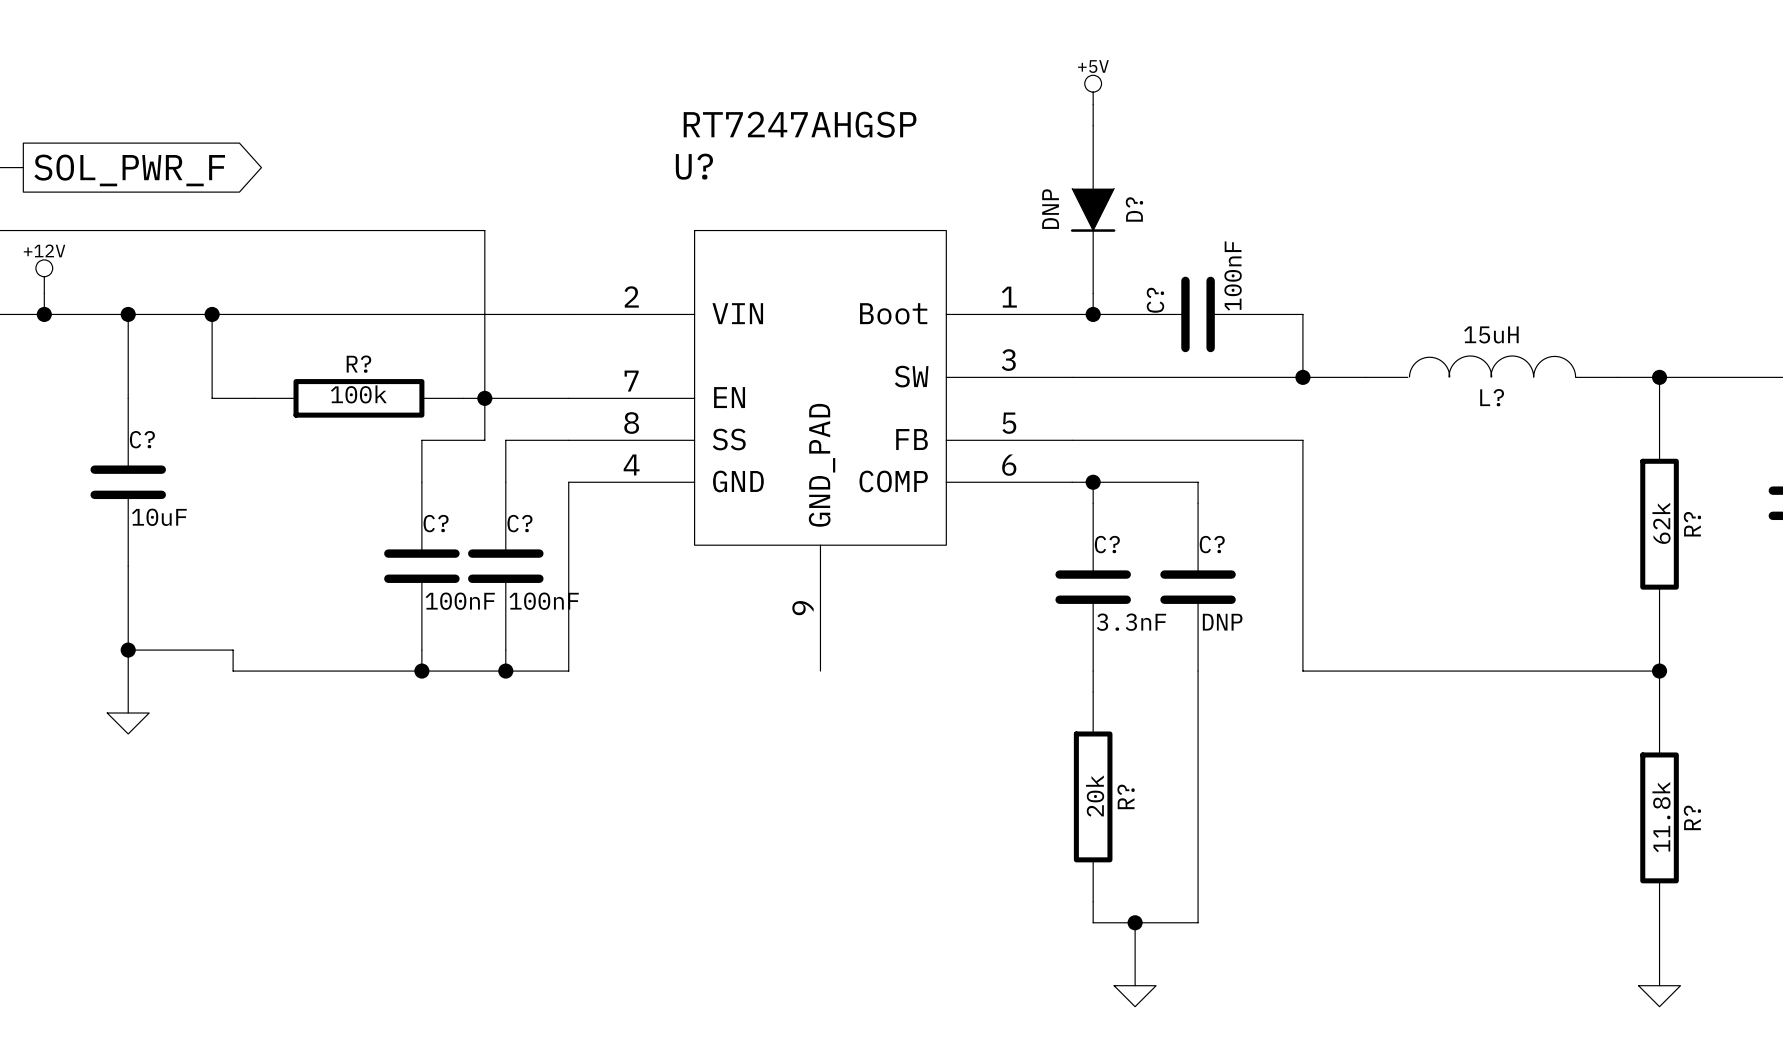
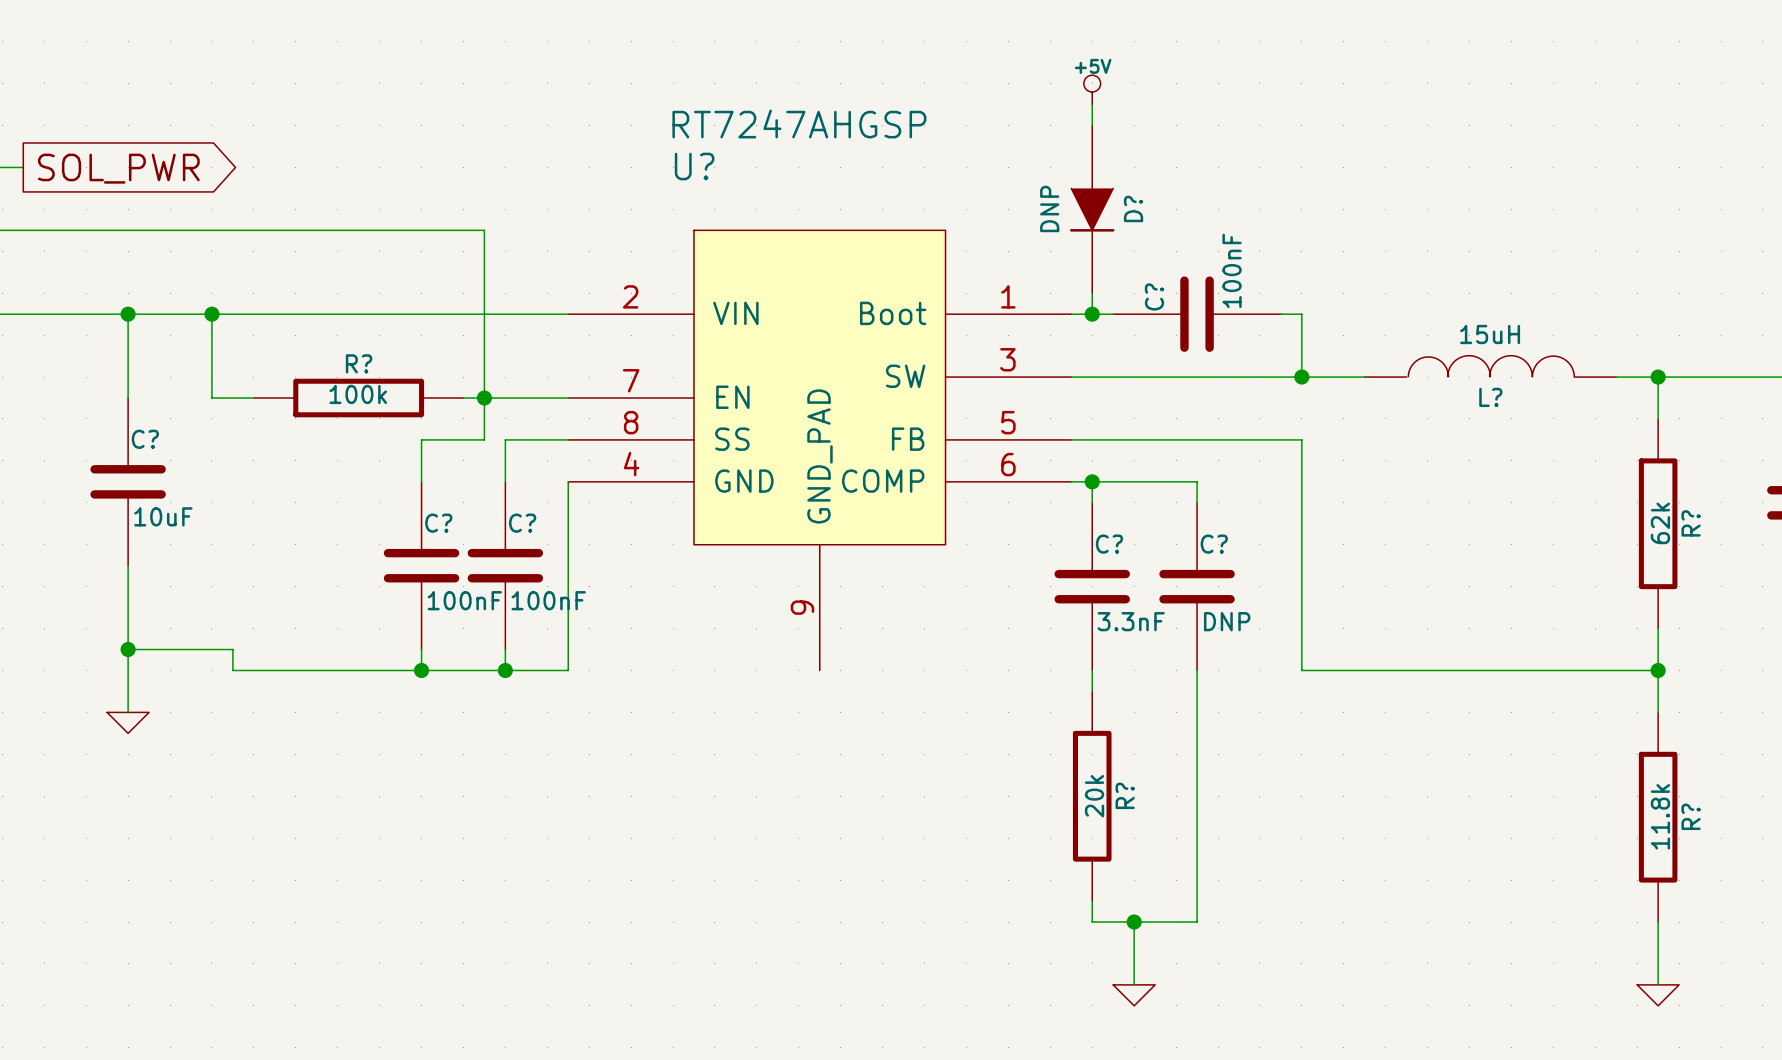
global label: SOL_PWR_F (129, 170) -> SOL_PWR (118, 168)
power symbol: +12V (44, 276) -> none
wire: (44, 293) (44, 314) -> none
junction: (44, 314) -> none

